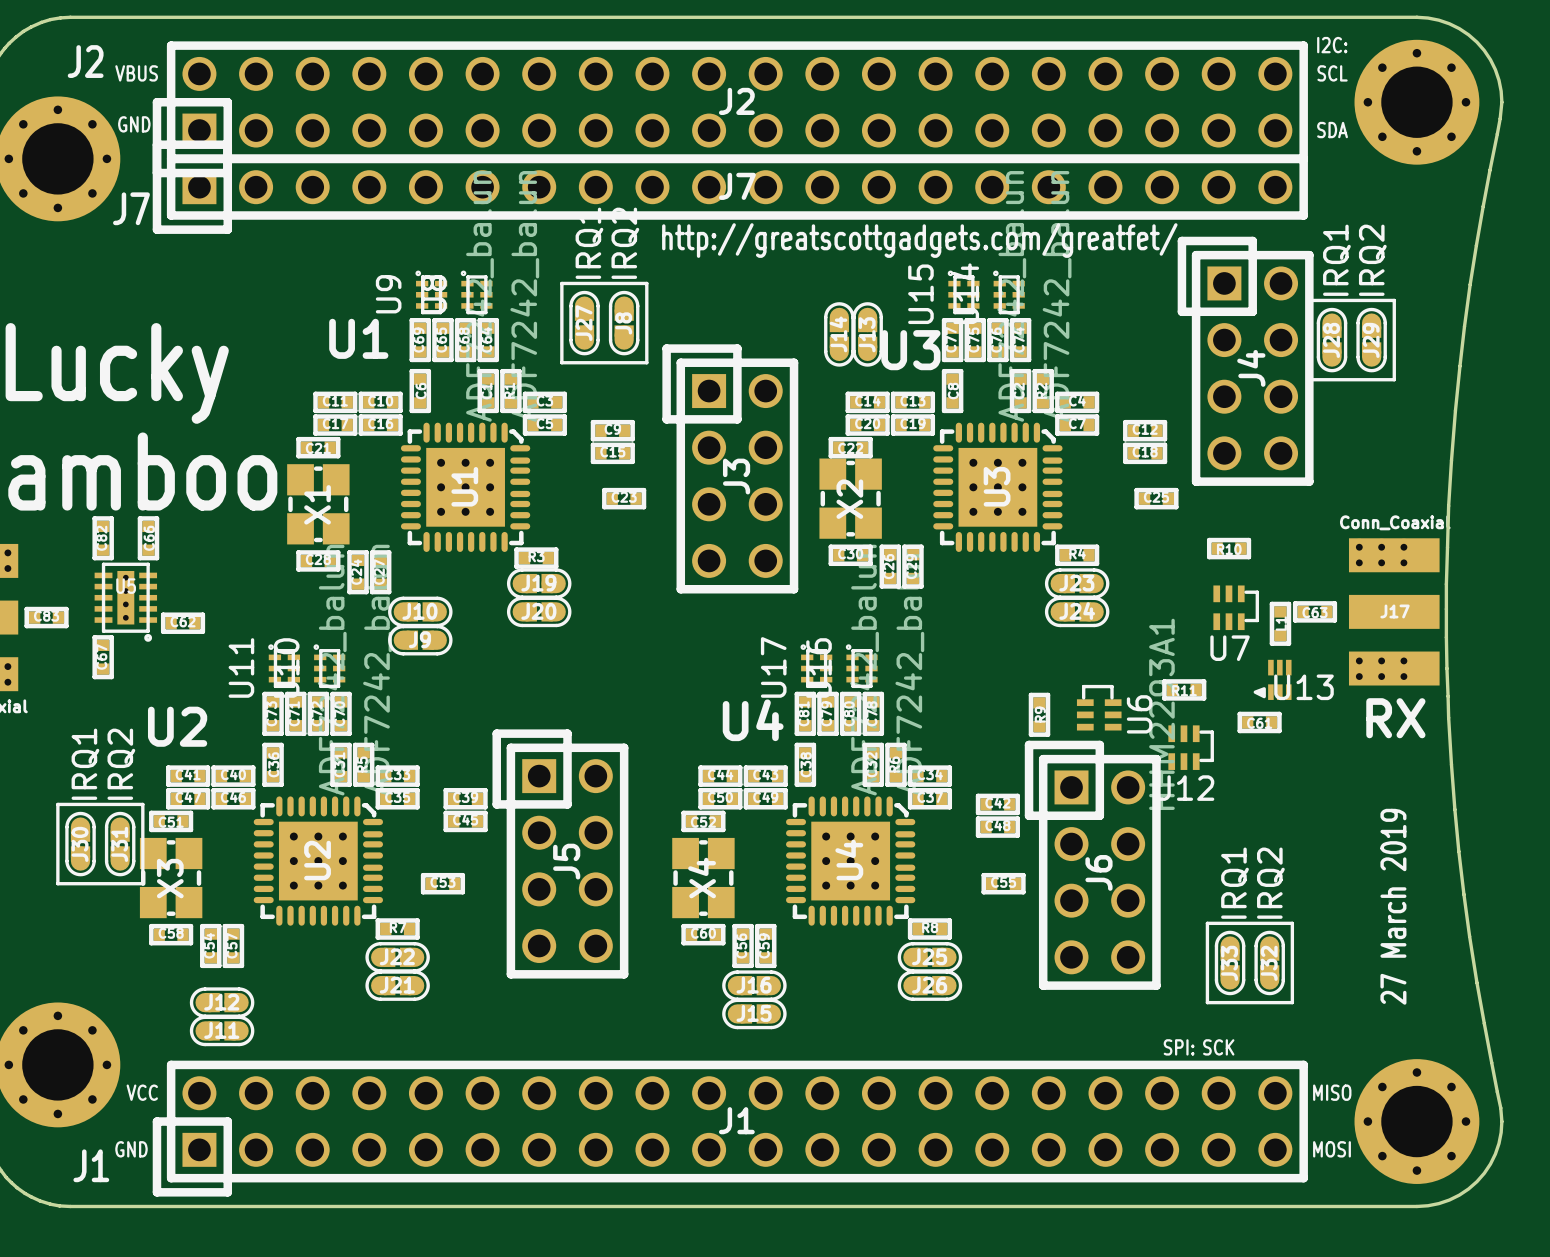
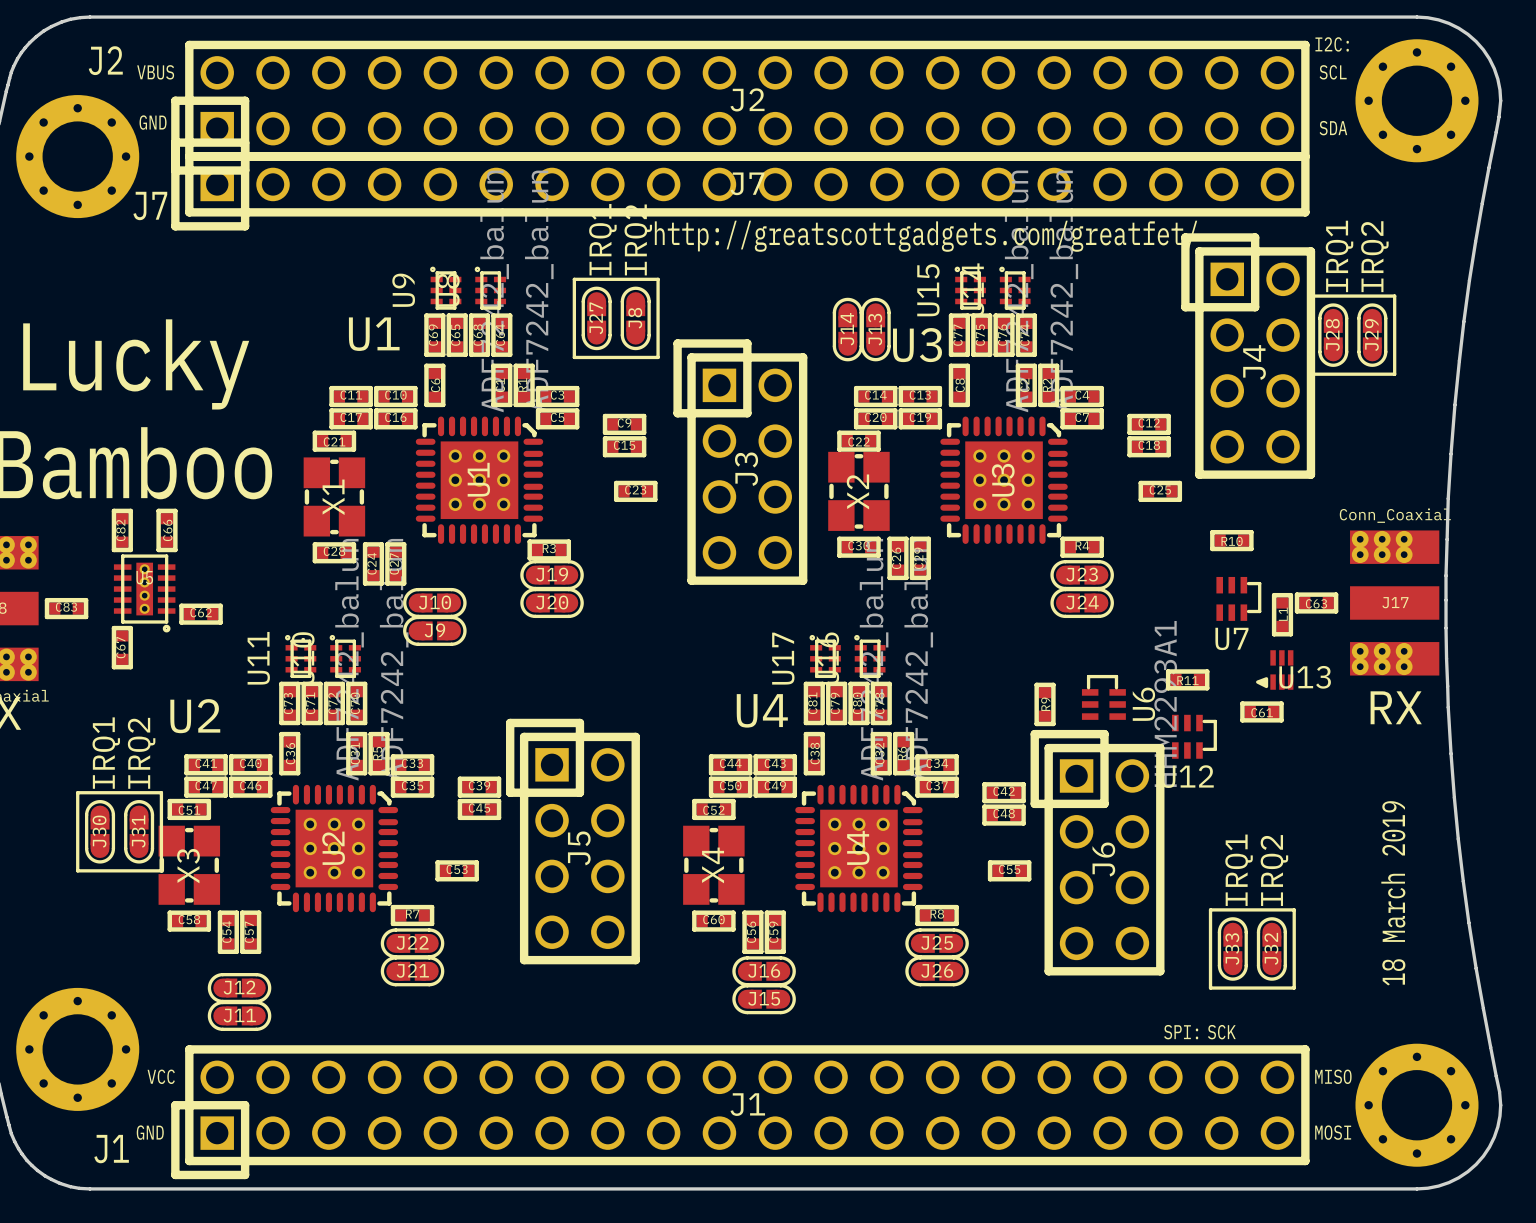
text: 27 March 2019 (1393, 906) -> 18 March 2019 (1393, 893)

